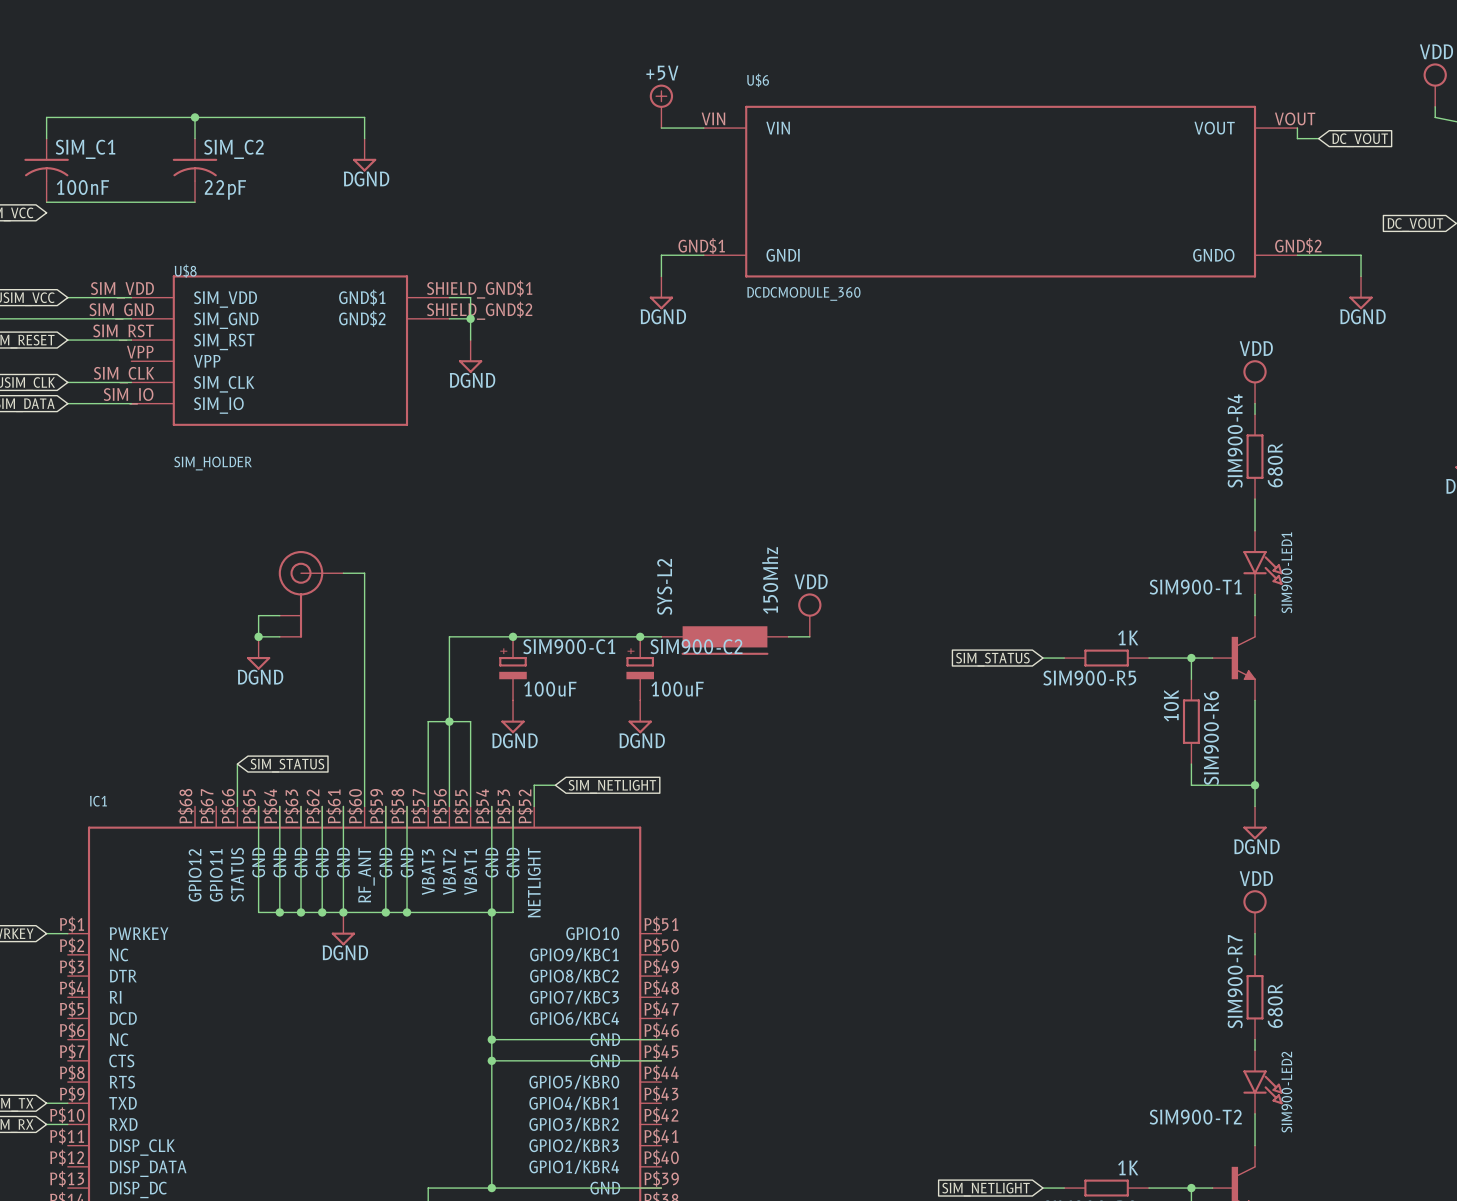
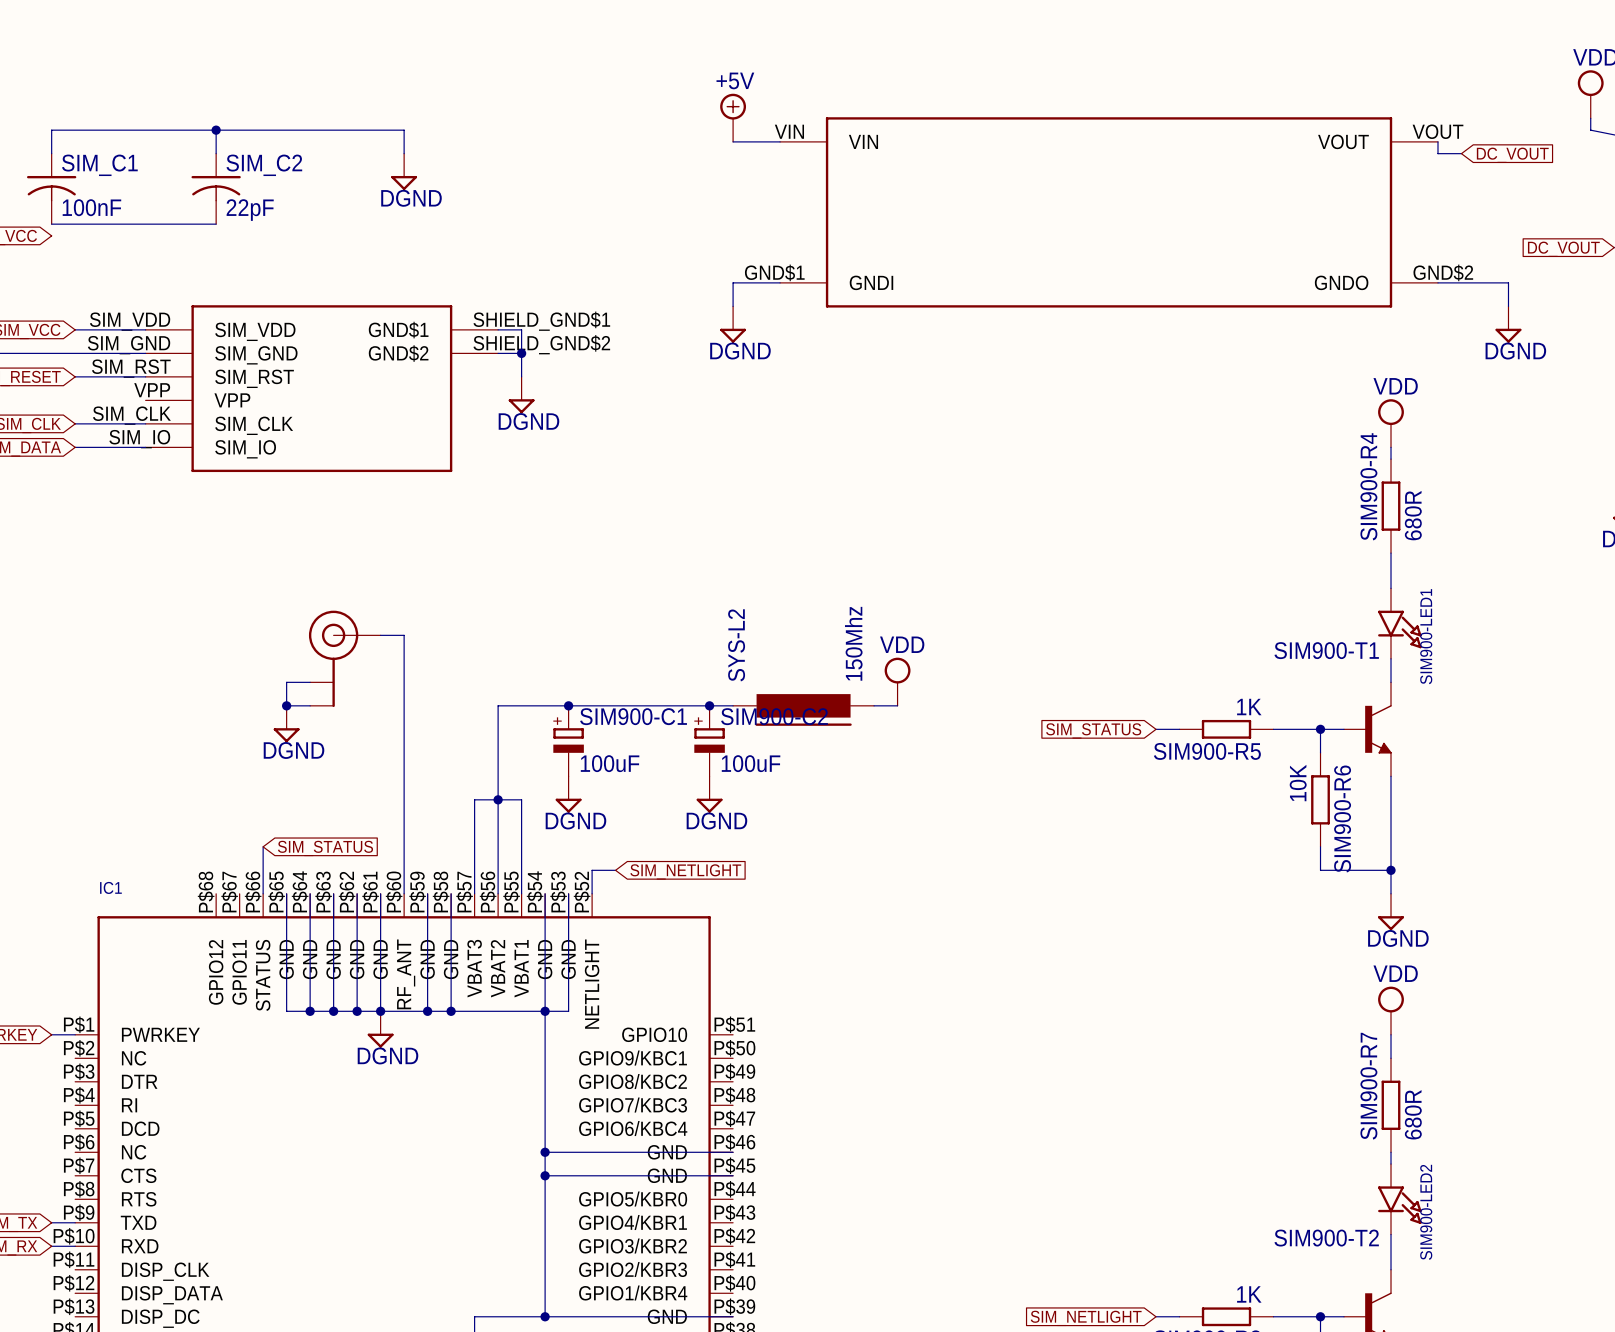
U$6 name: U$6 (758, 80) -> none
U$8 name: U$8 (185, 271) -> none
U$6 value: DCDCMODULE_360 (803, 293) -> none
U$8 value: SIM_HOLDER (213, 463) -> none

